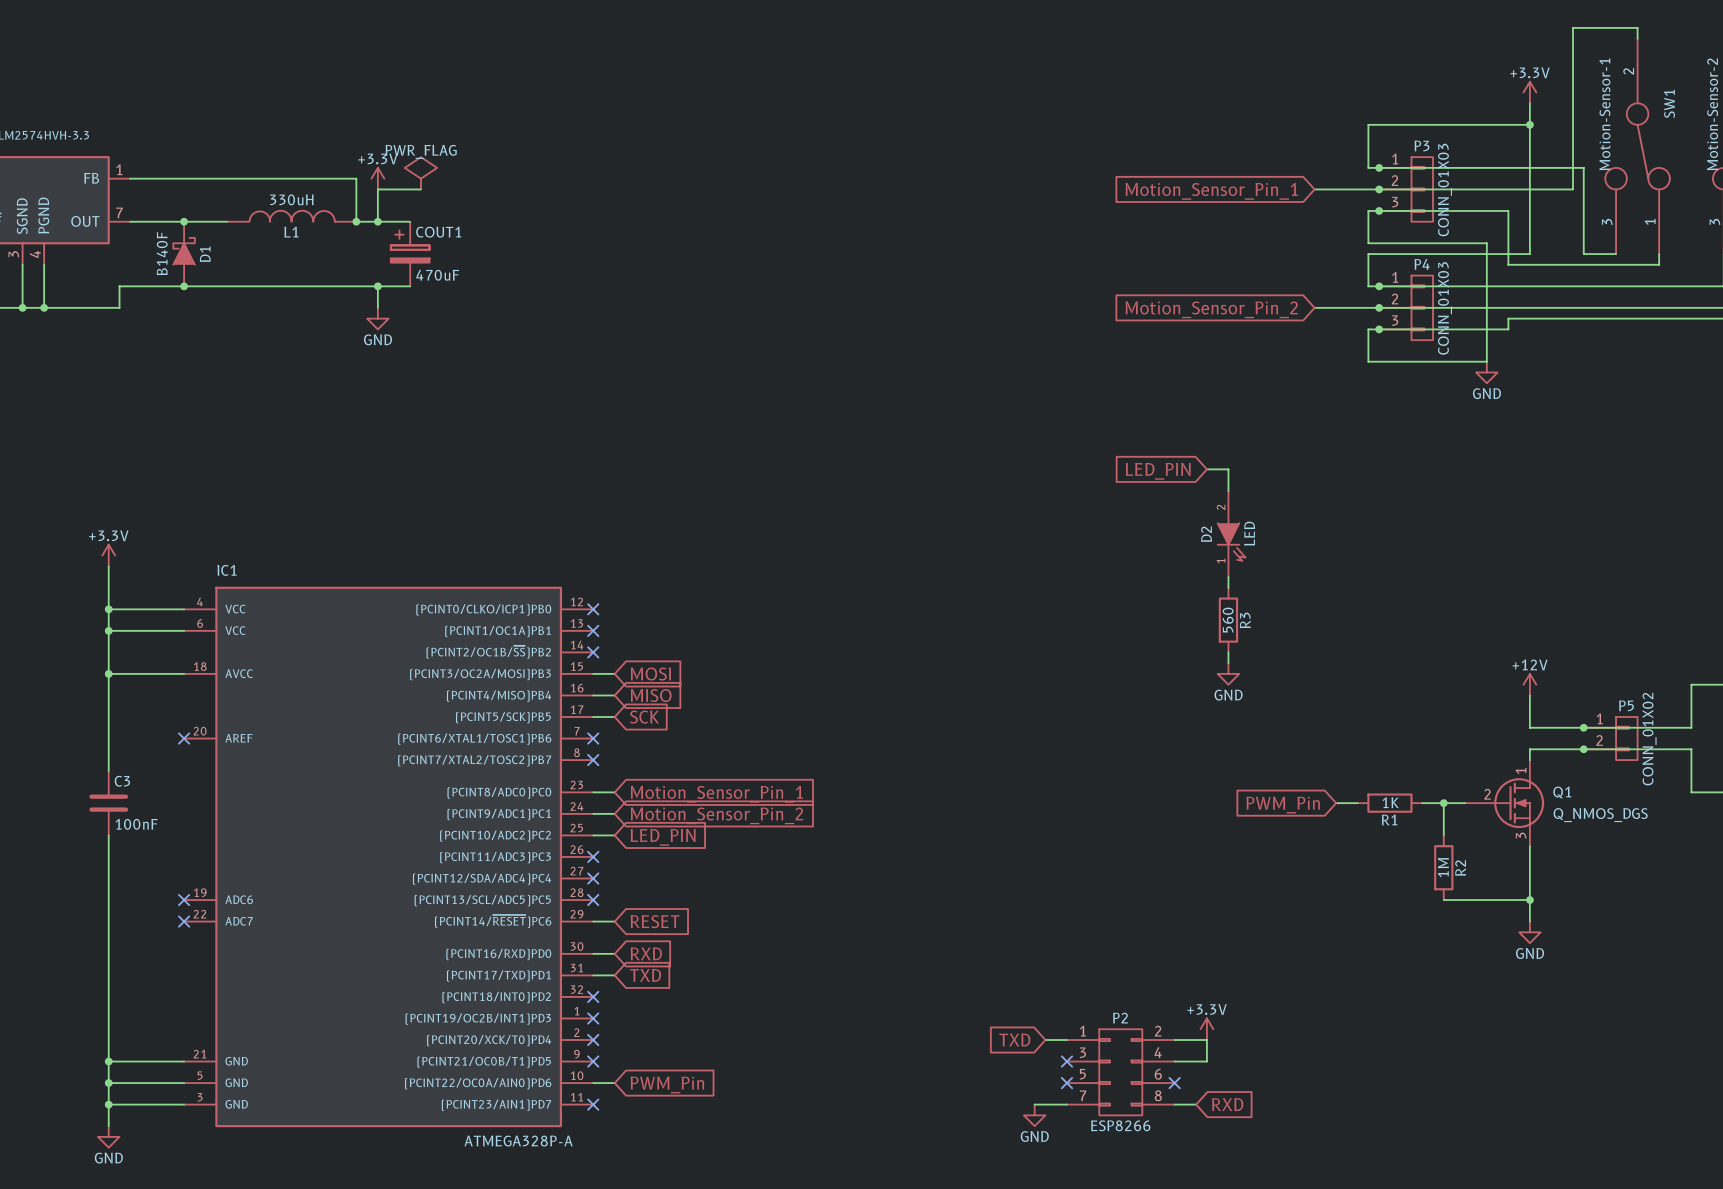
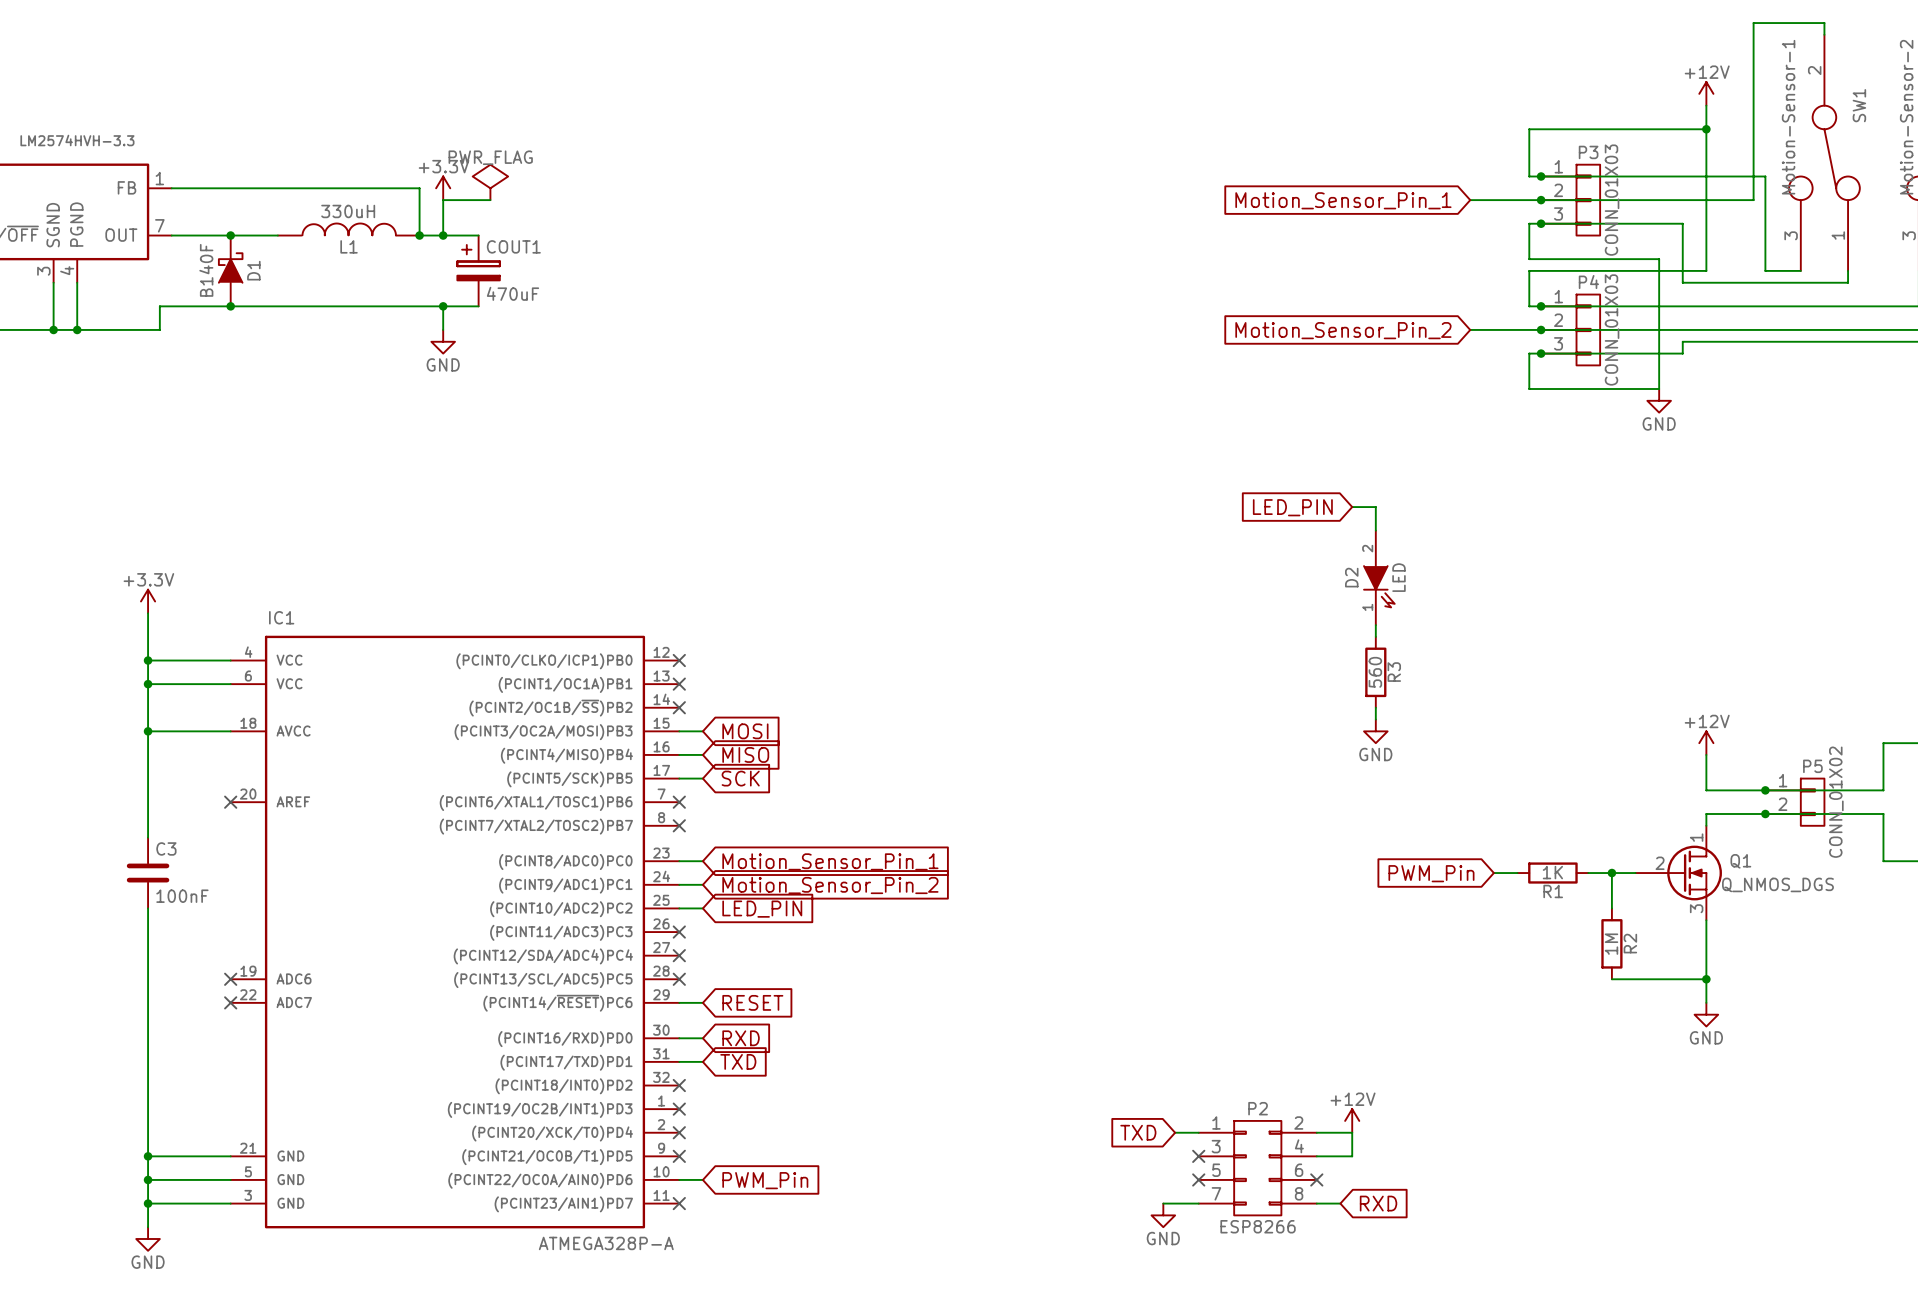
power symbol: +3.3V (1529, 92) -> +12V (1706, 93)
power symbol: +3.3V (1206, 1029) -> +12V (1352, 1120)

